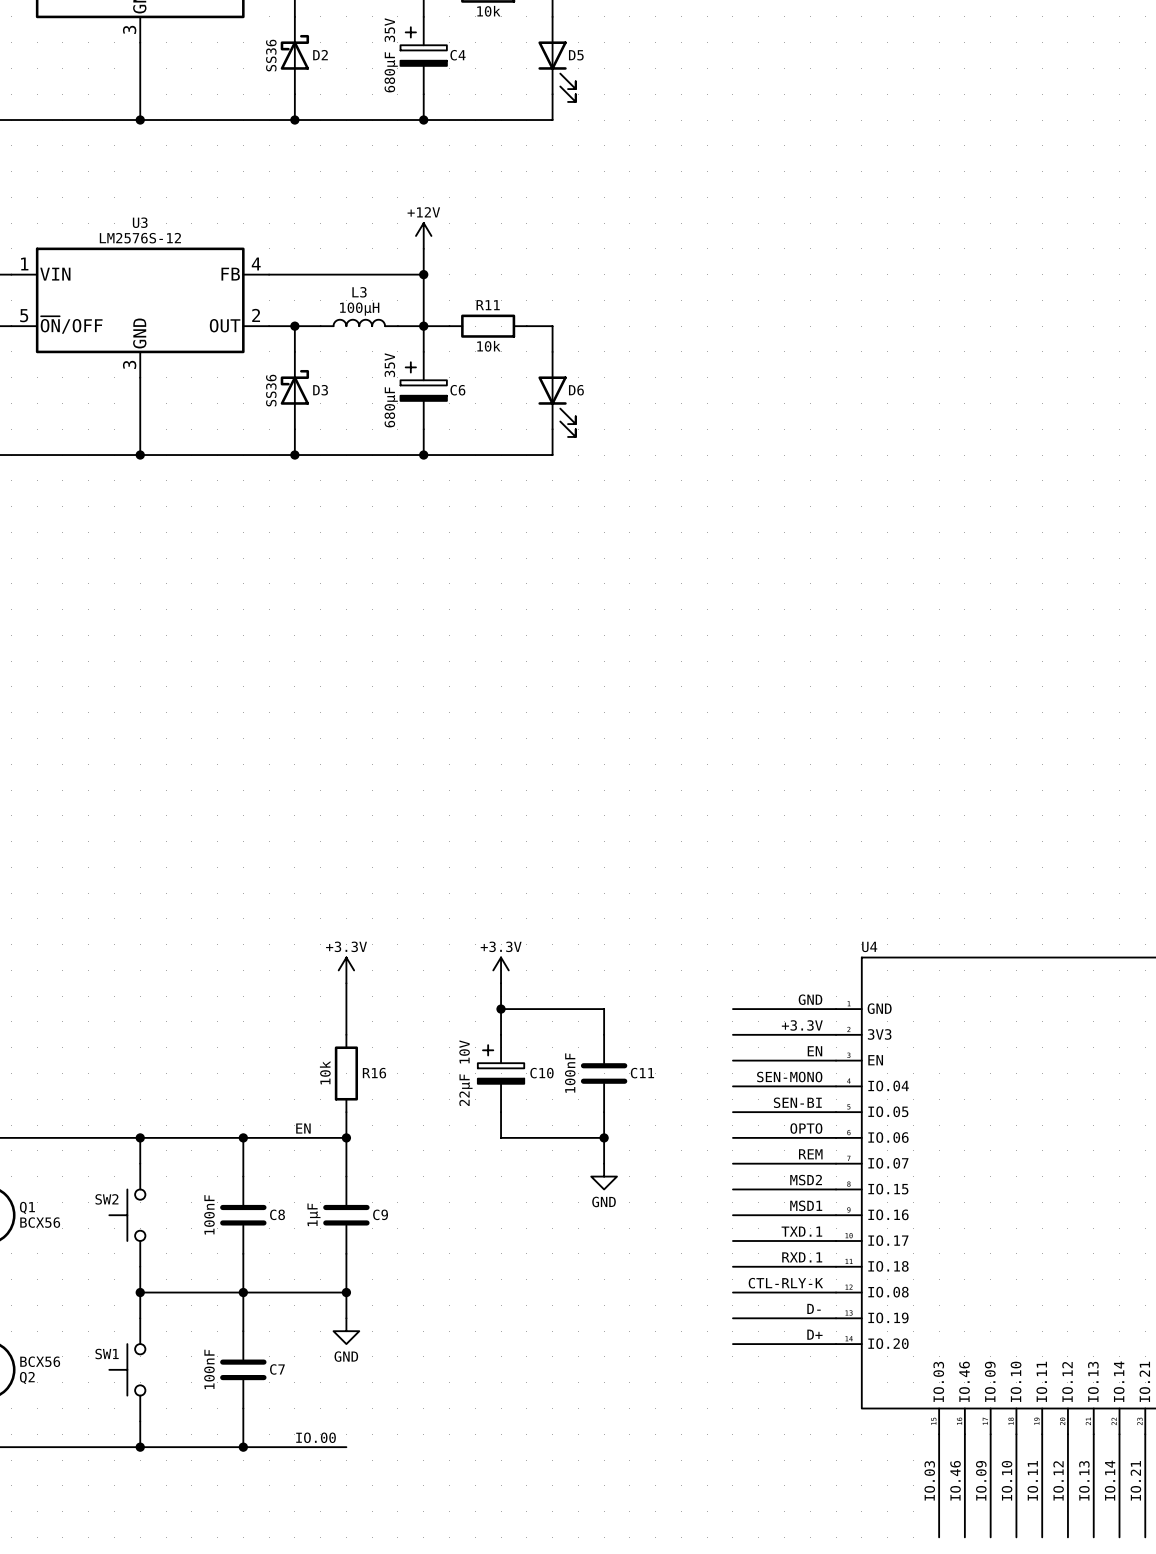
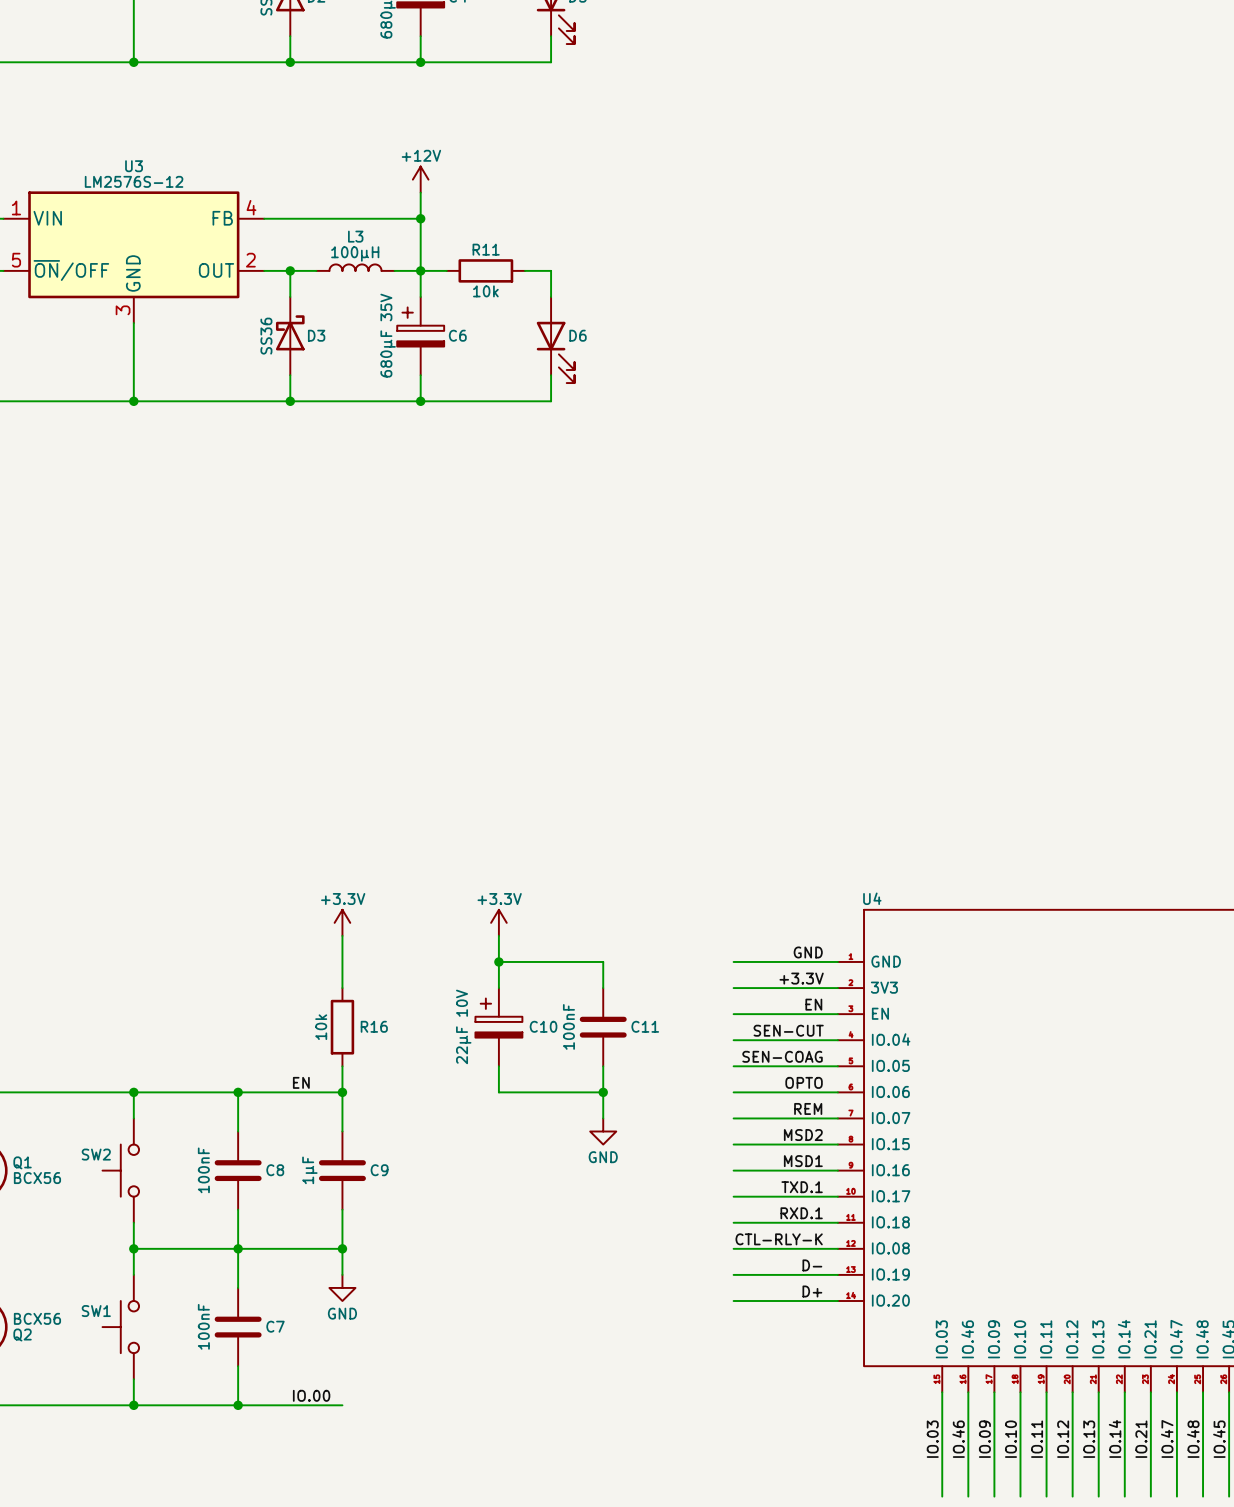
label: SEN-MONO (789, 1077) -> SEN-CUT (788, 1030)
label: SEN-BI (797, 1102) -> SEN-COAG (782, 1056)

